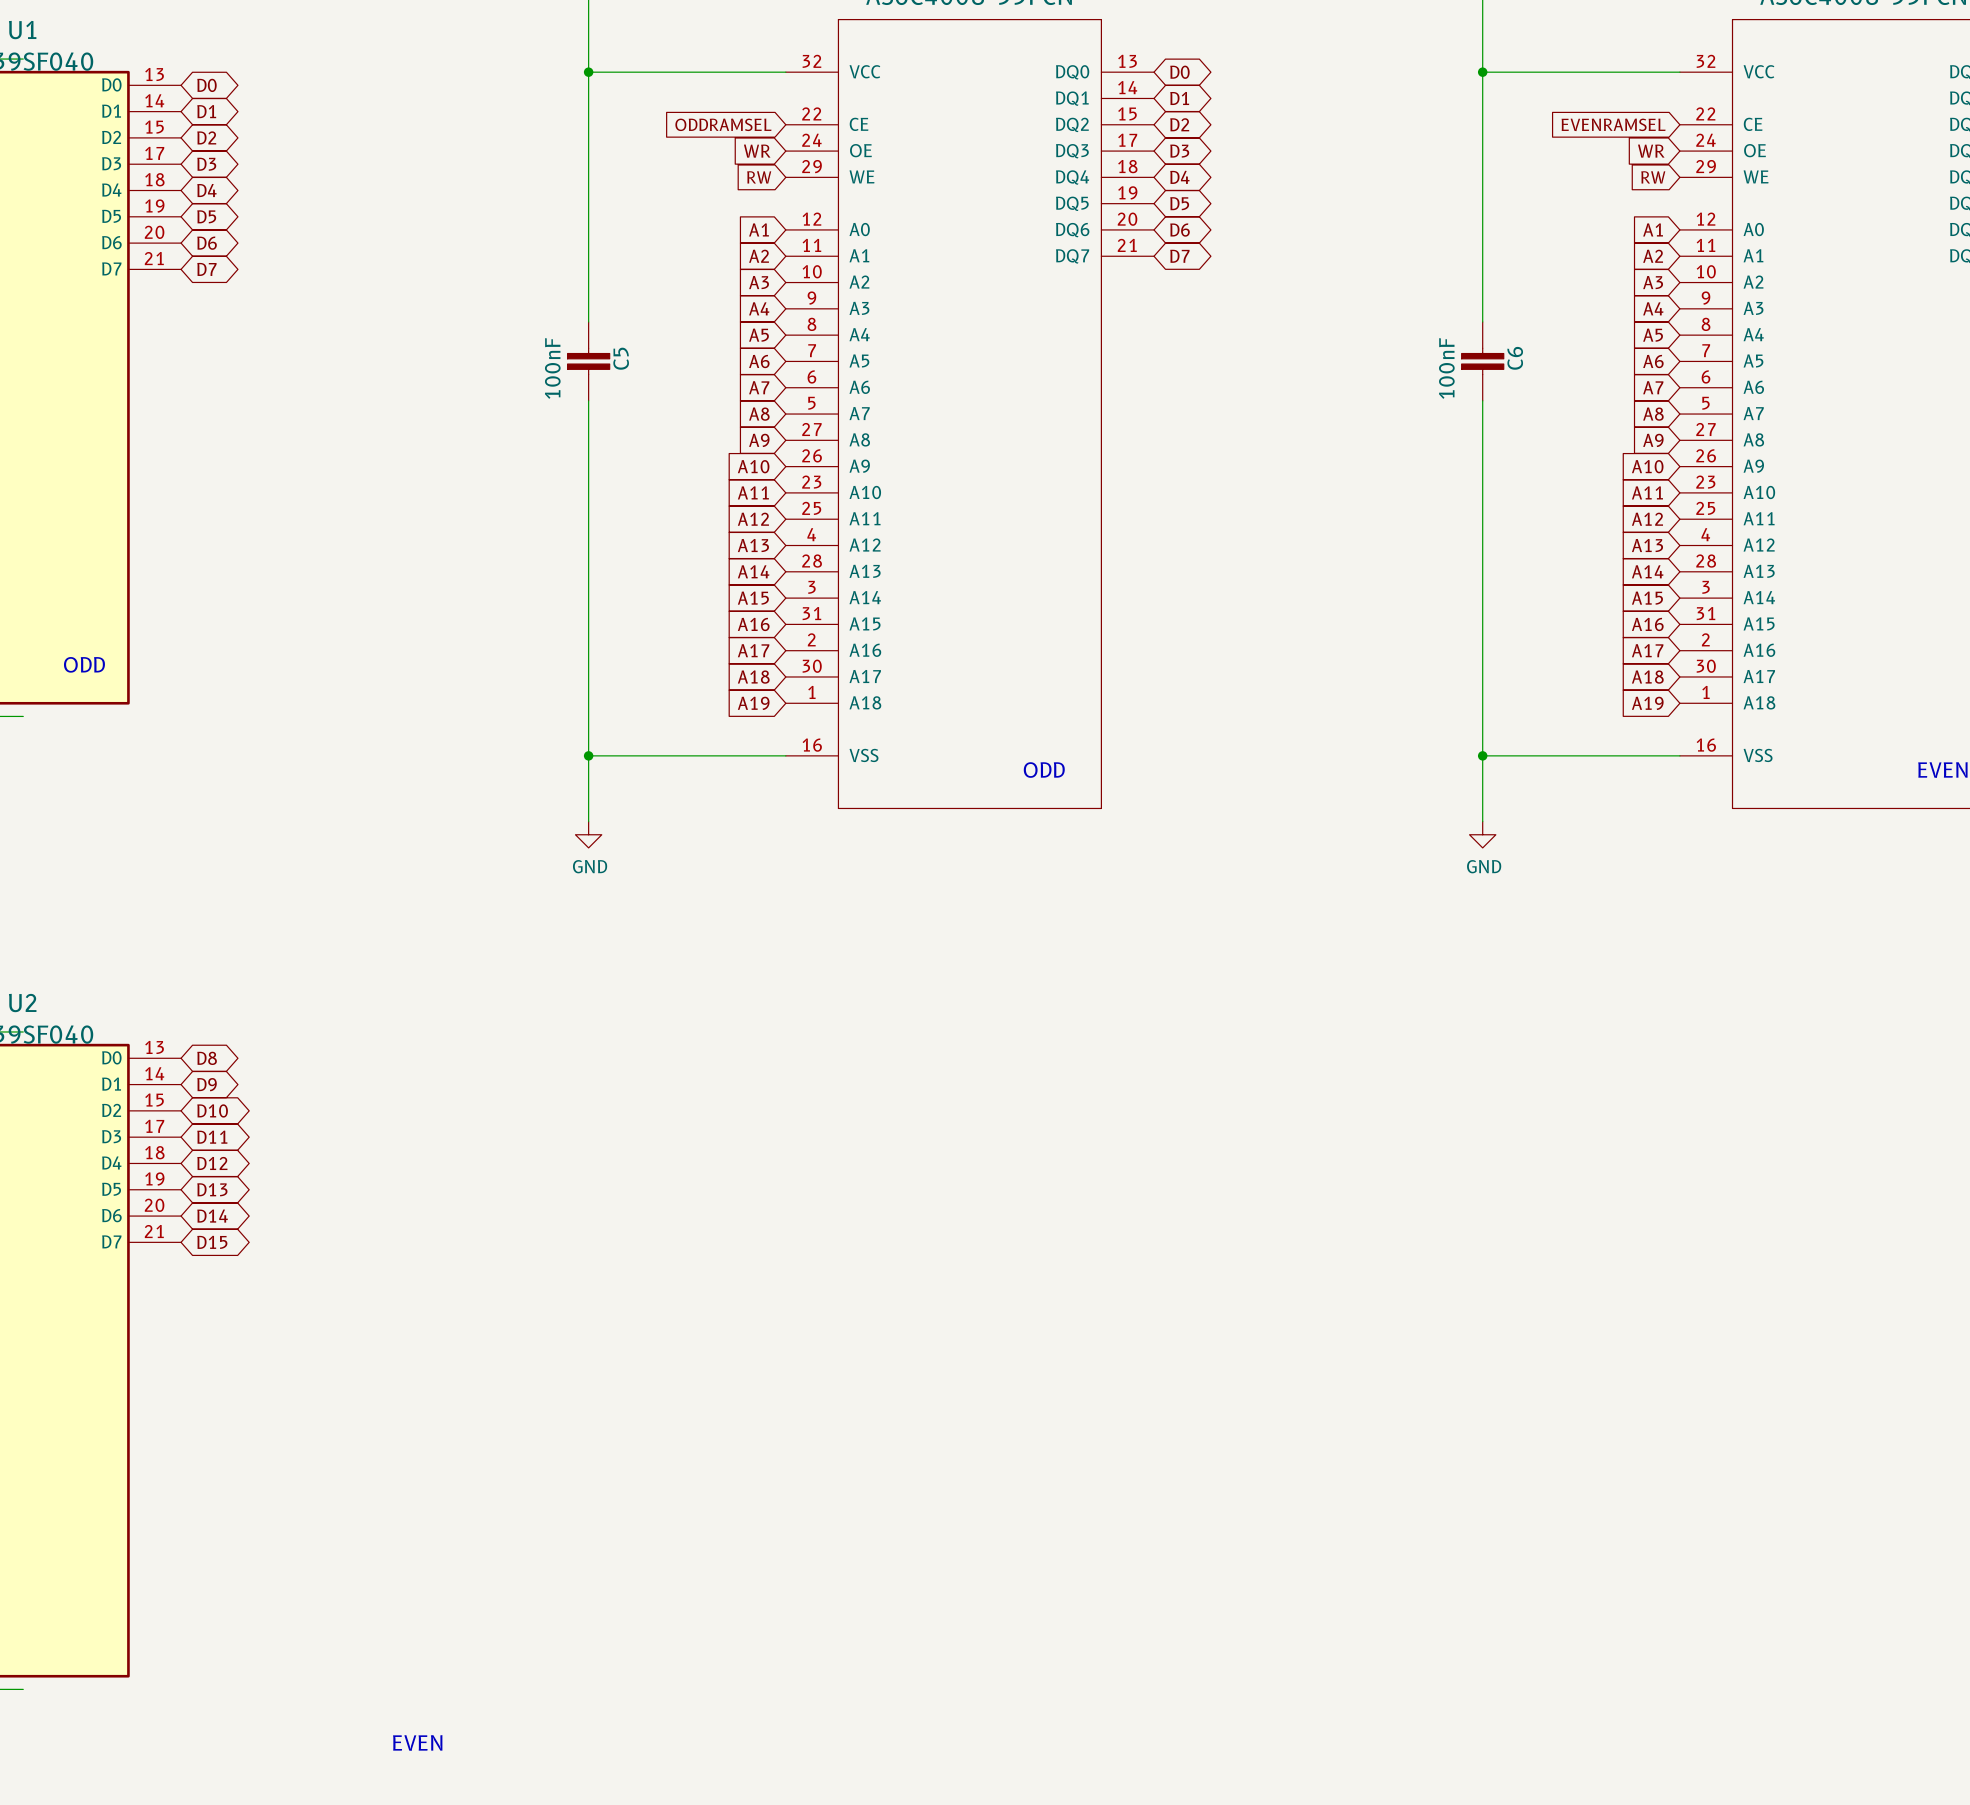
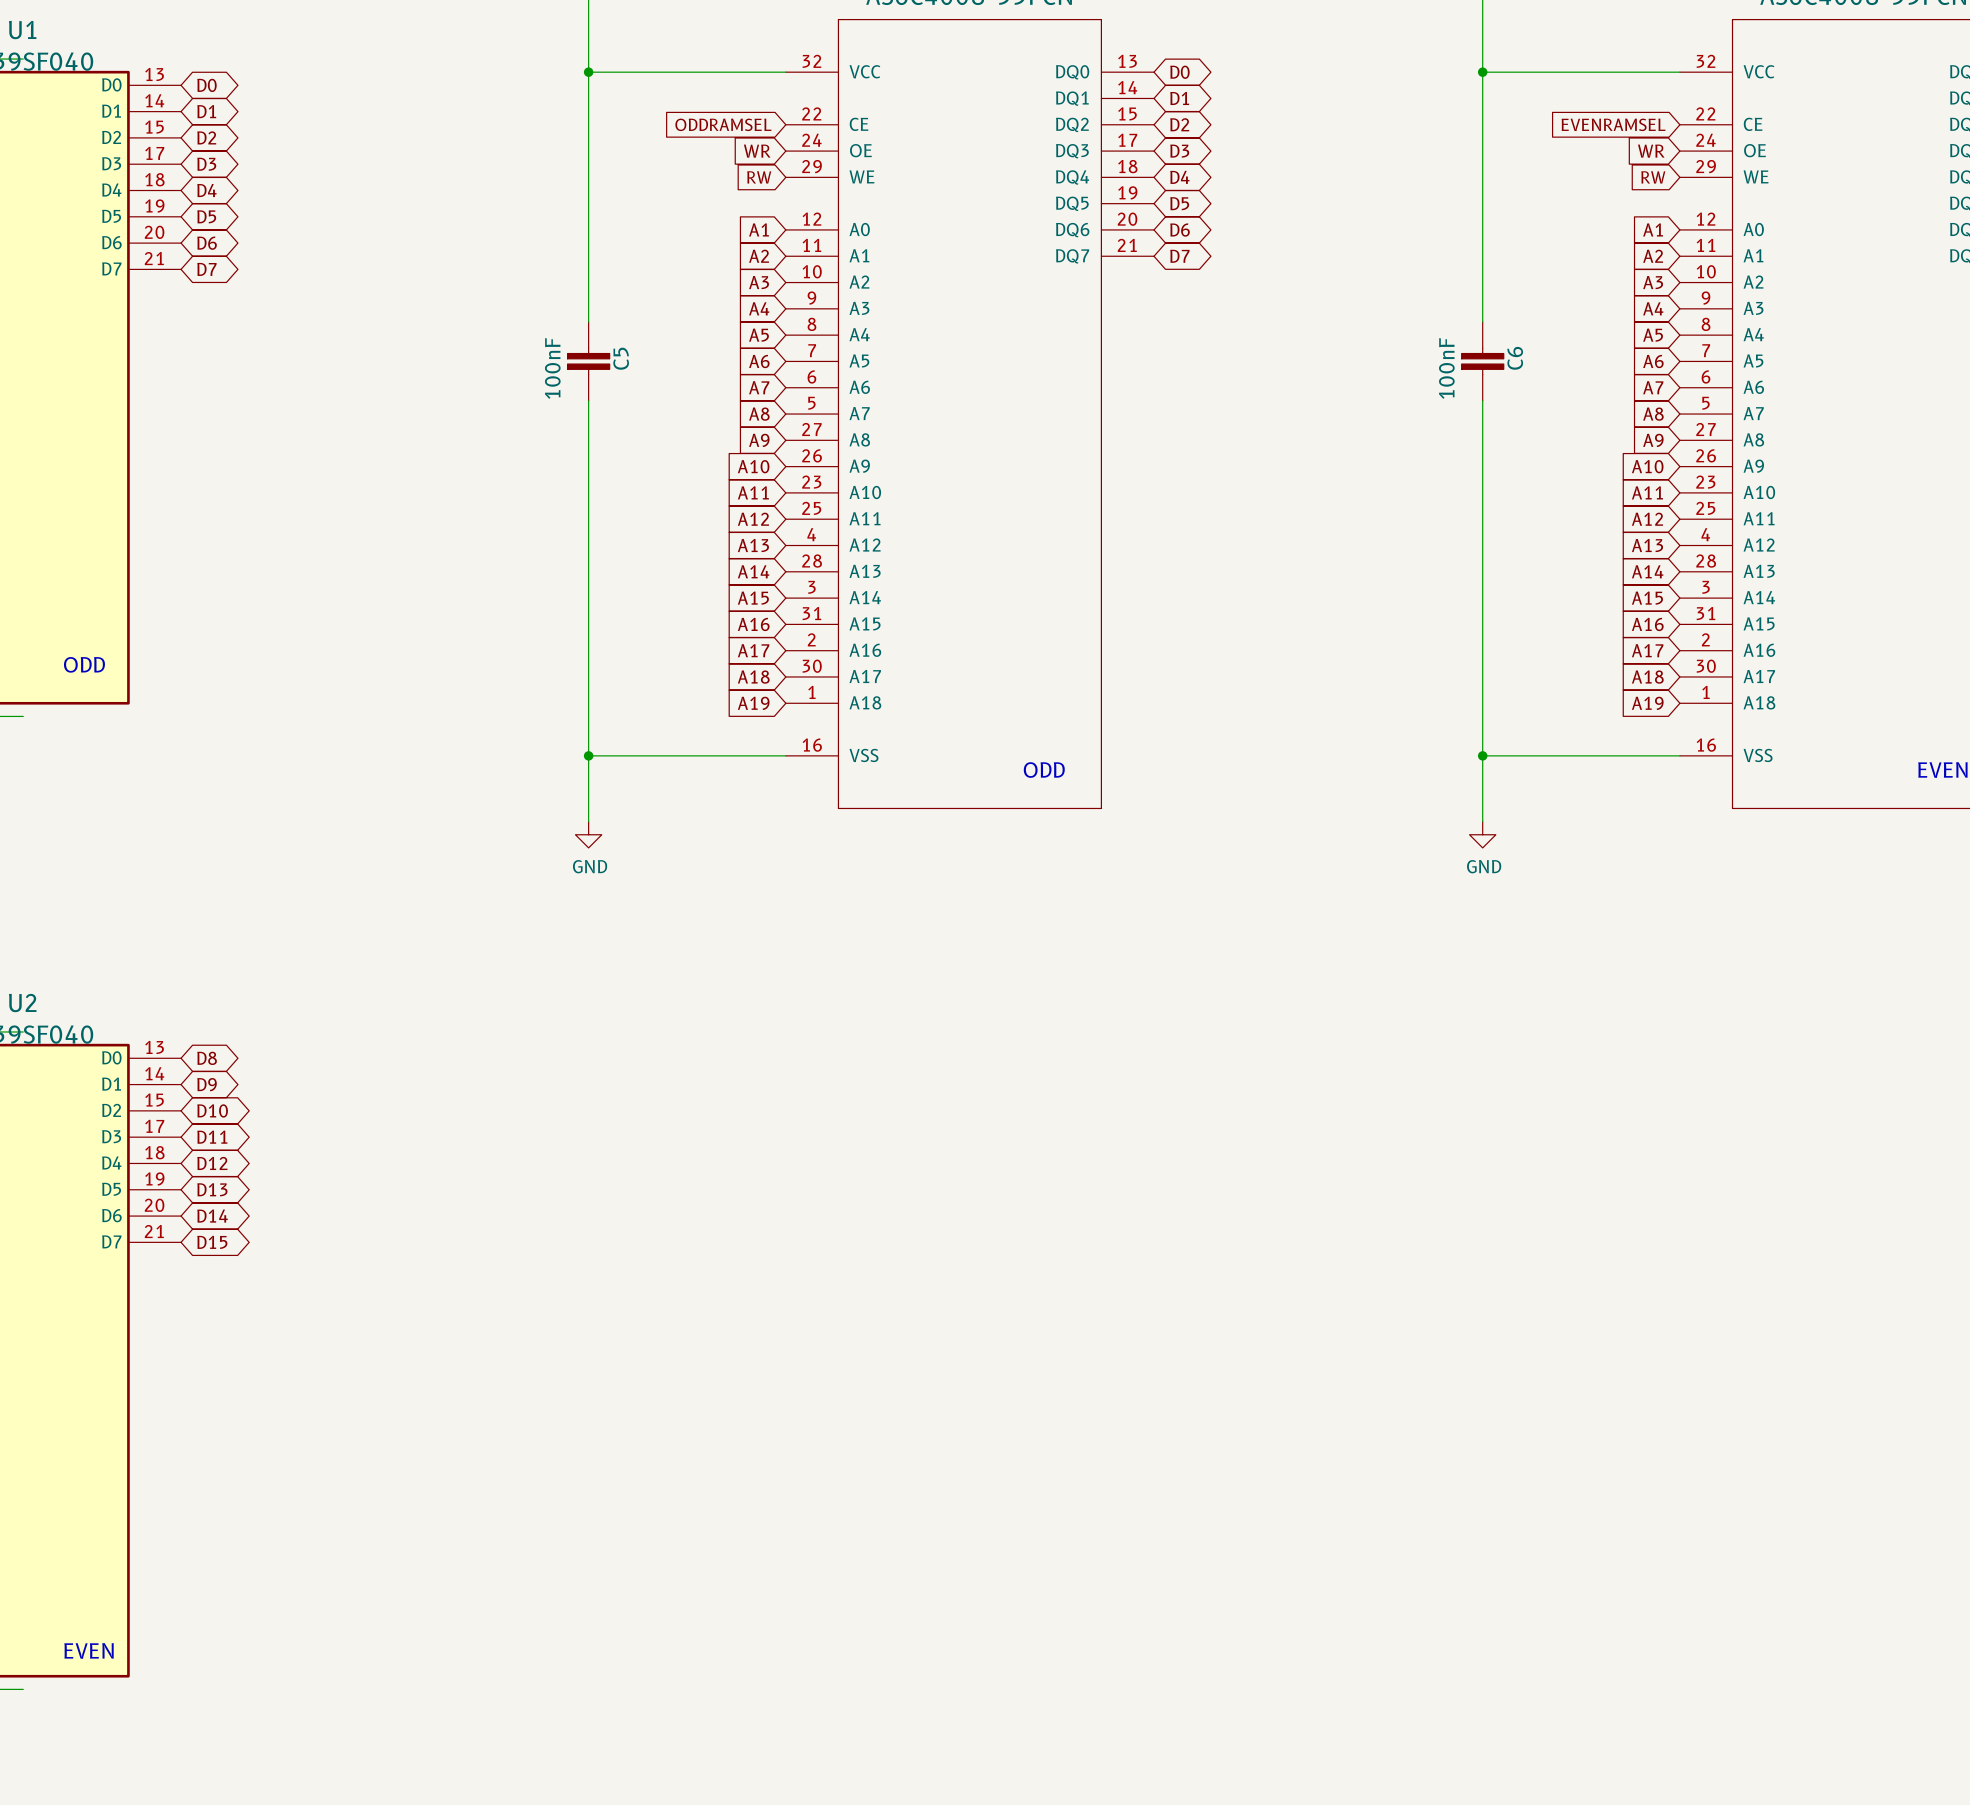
text: none -> EVEN (89, 1650)
text: EVEN (417, 1742) -> none

